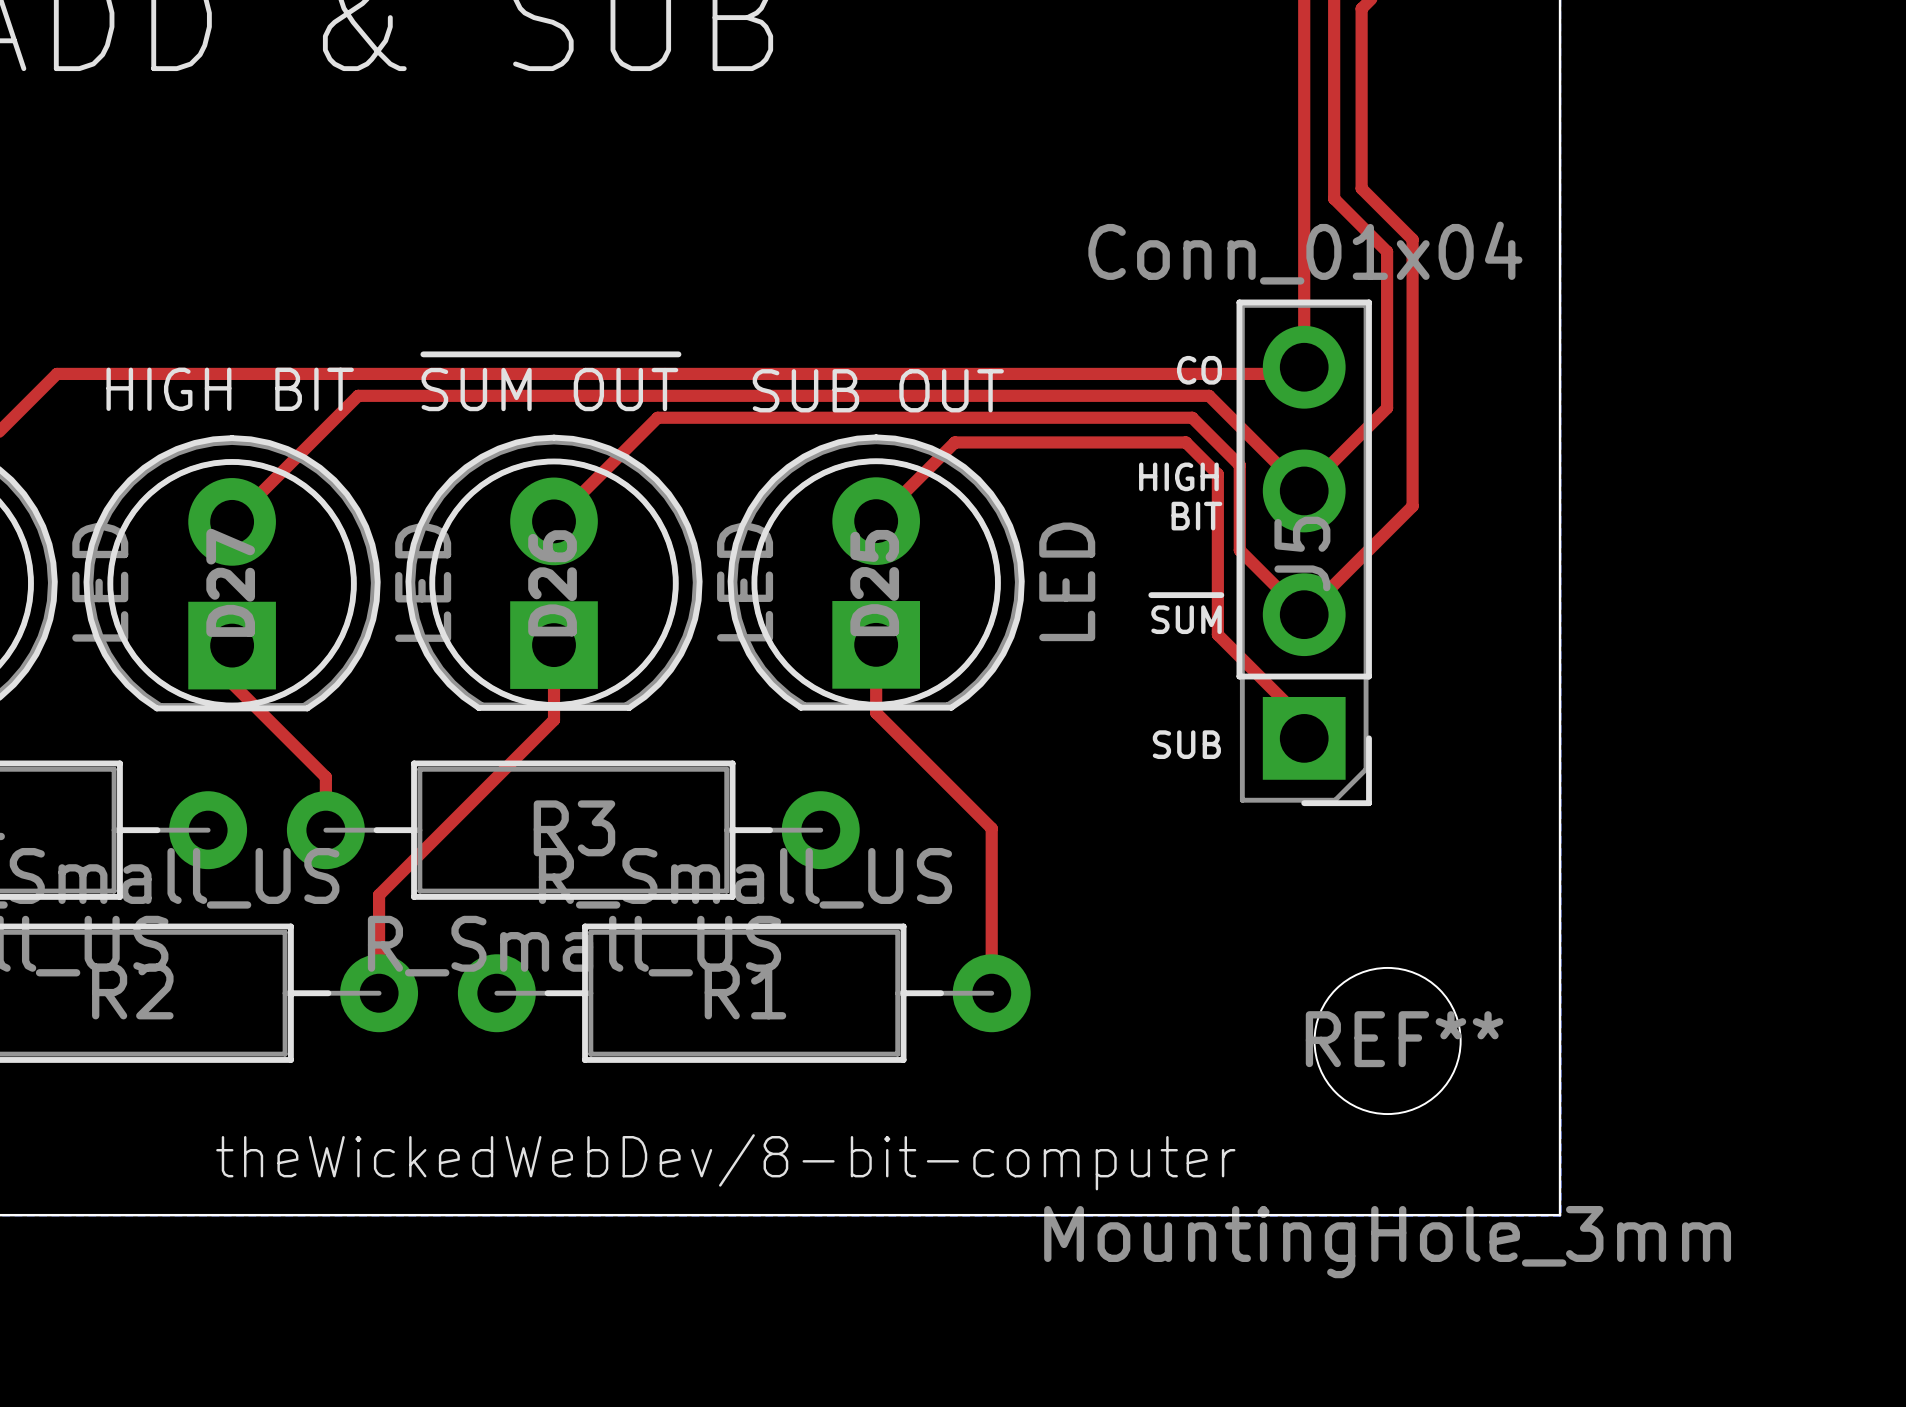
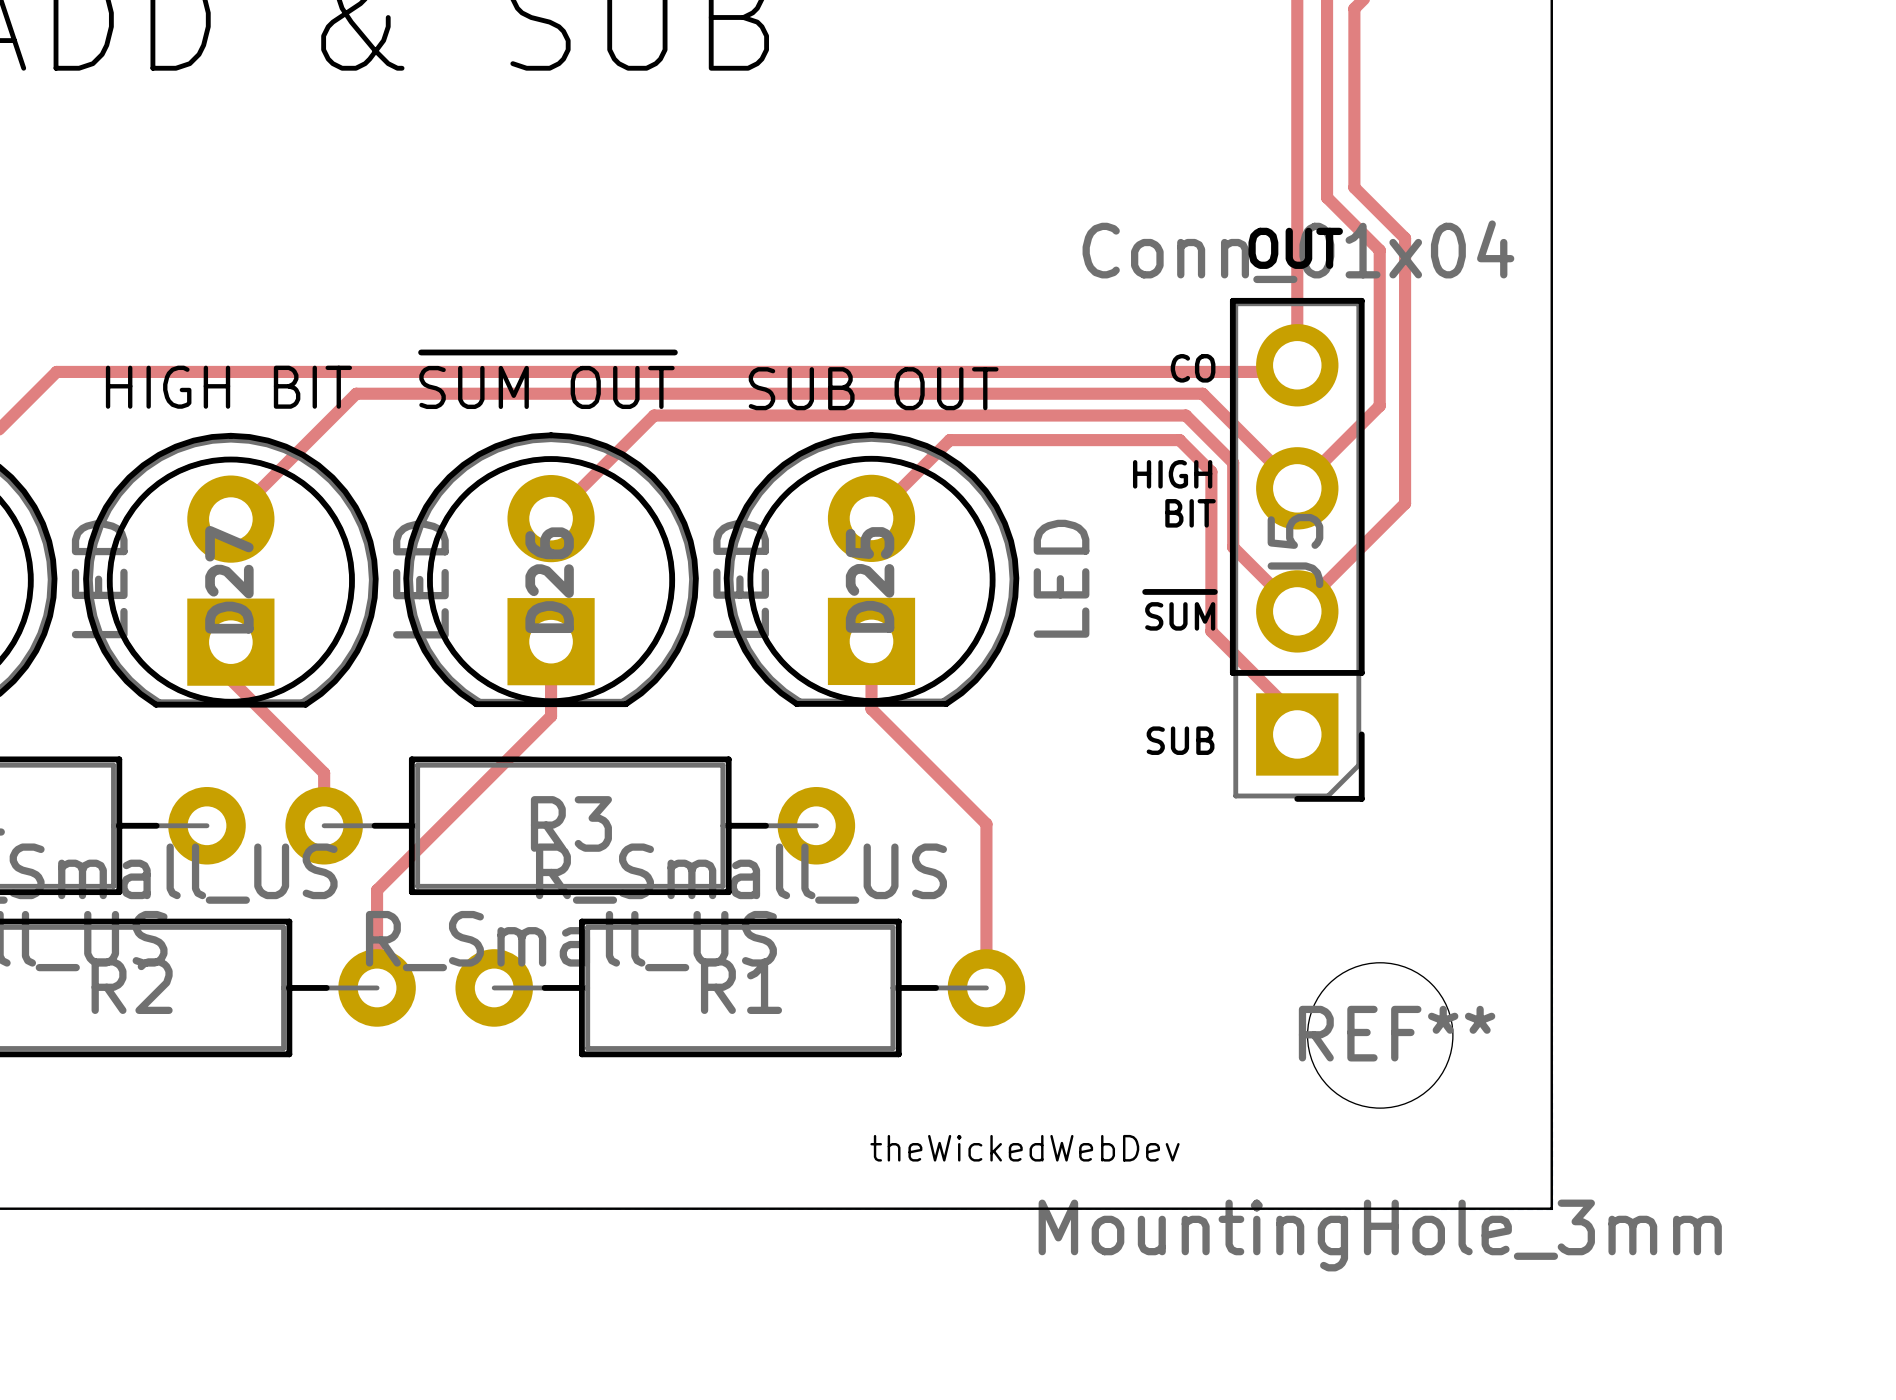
text: none -> OUT (1295, 248)
text: theWickedWebDev/8-bit-computer (725, 1162) -> theWickedWebDev (1024, 1148)

